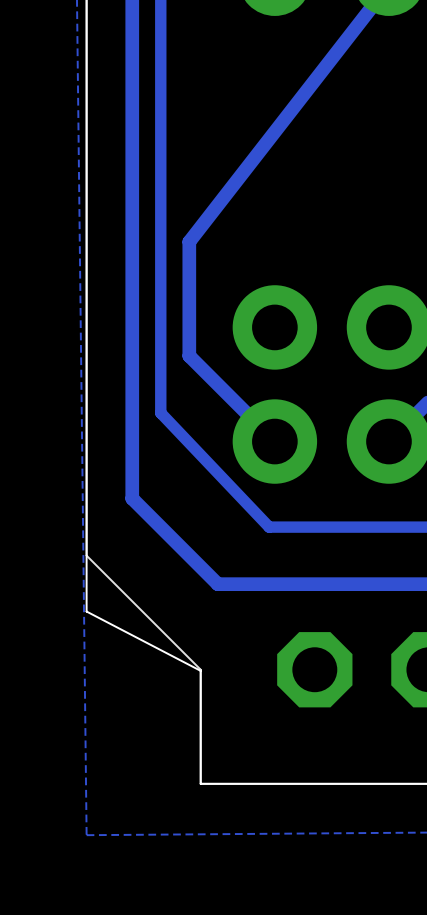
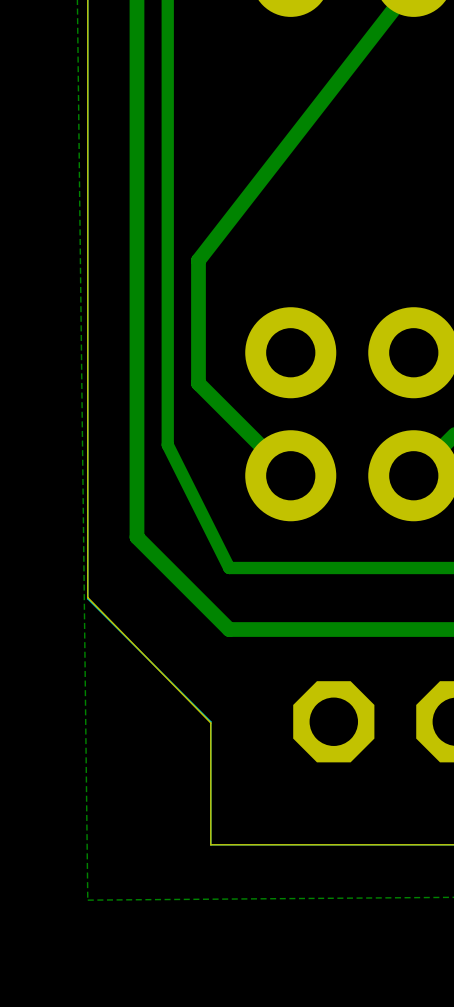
track: (160, 413) (269, 527) -> (167, 444) (229, 568) (284, 568)
board edge: (86, 554) (86, 611) (200, 670) -> (87, 597) (210, 723)

